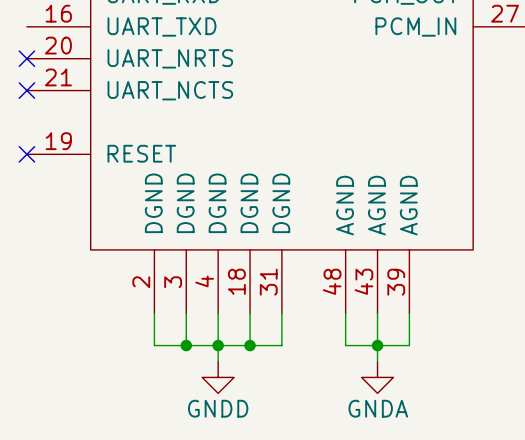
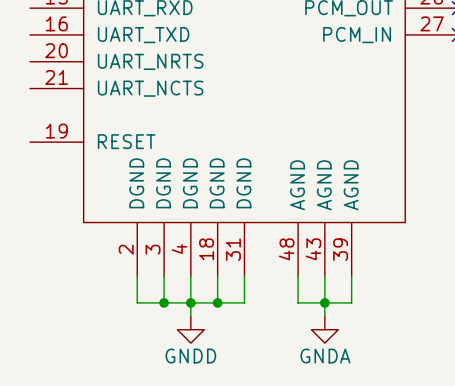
no-connect mark: (26, 58) -> none
no-connect mark: (26, 90) -> none
no-connect mark: (26, 154) -> none

